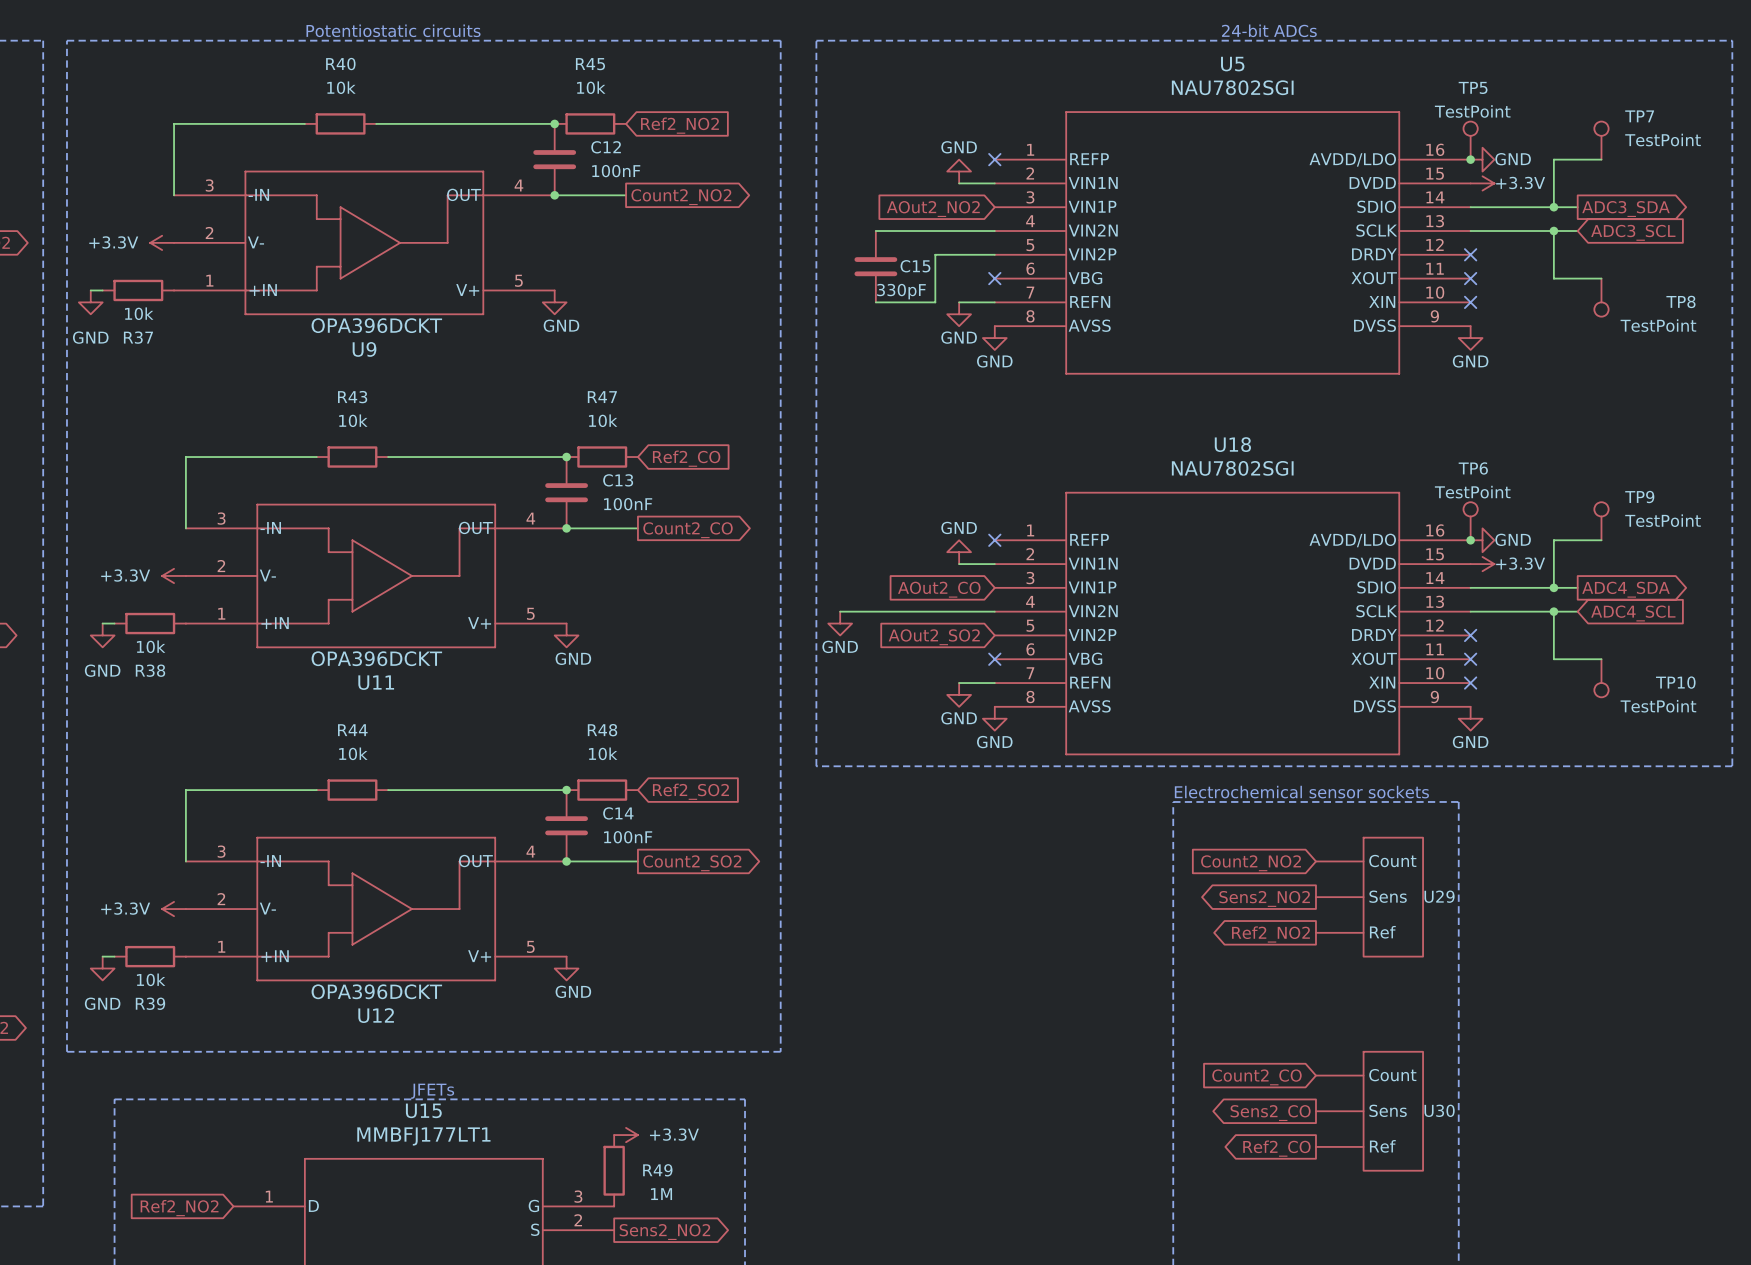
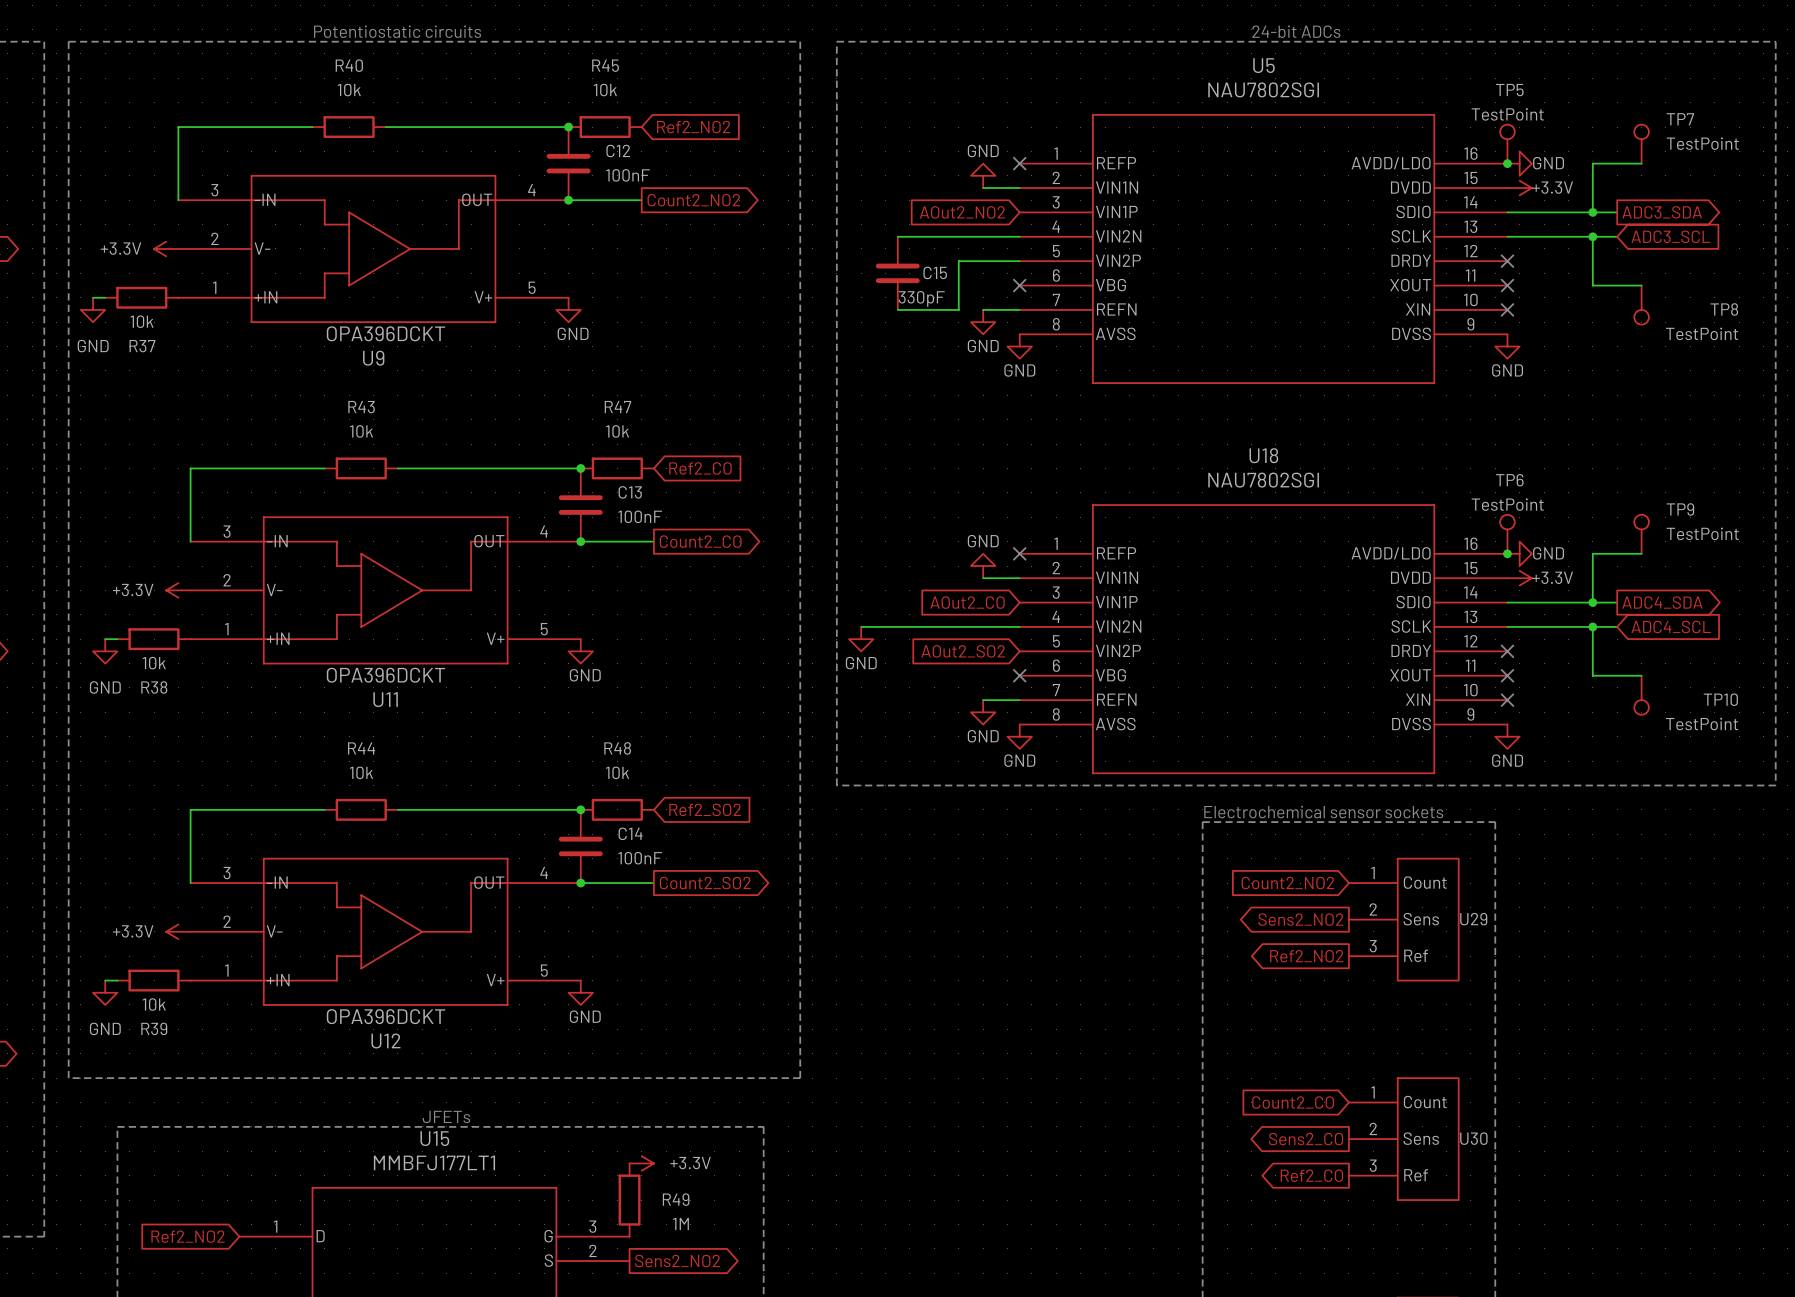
U29 pin number: none -> 1 (1373, 872)
U29 pin number: none -> 2 (1373, 909)
U29 pin number: none -> 3 (1373, 946)
U30 pin number: none -> 1 (1373, 1092)
U30 pin number: none -> 2 (1373, 1128)
U30 pin number: none -> 3 (1373, 1165)

